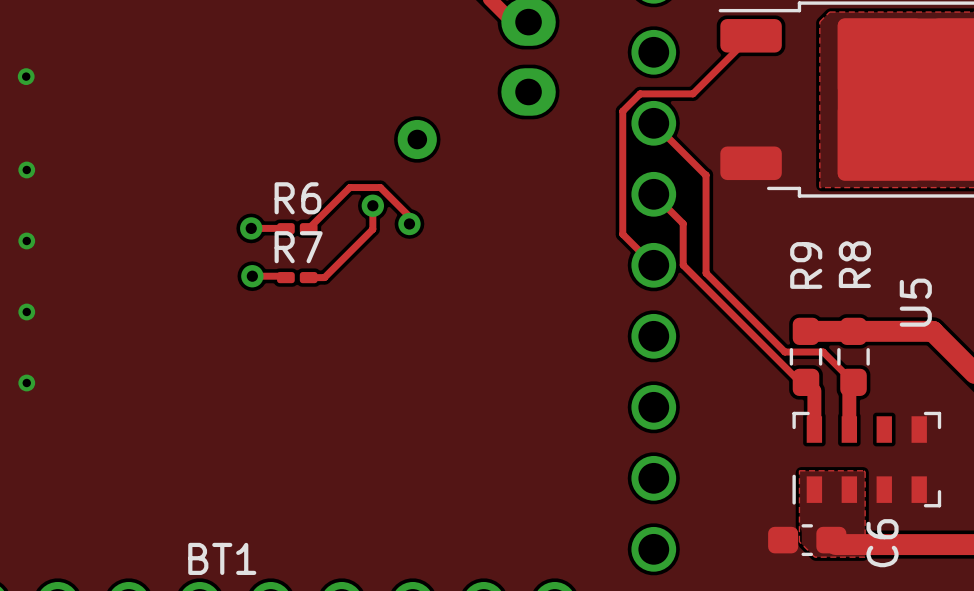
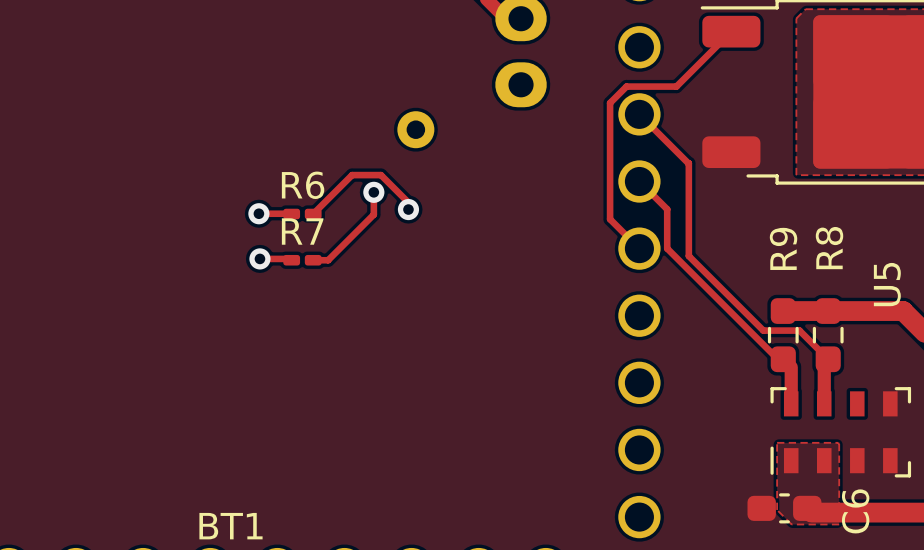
part: (26, 76) -> none
part: (26, 169) -> none
part: (26, 240) -> none
part: (26, 311) -> none
part: (26, 382) -> none

